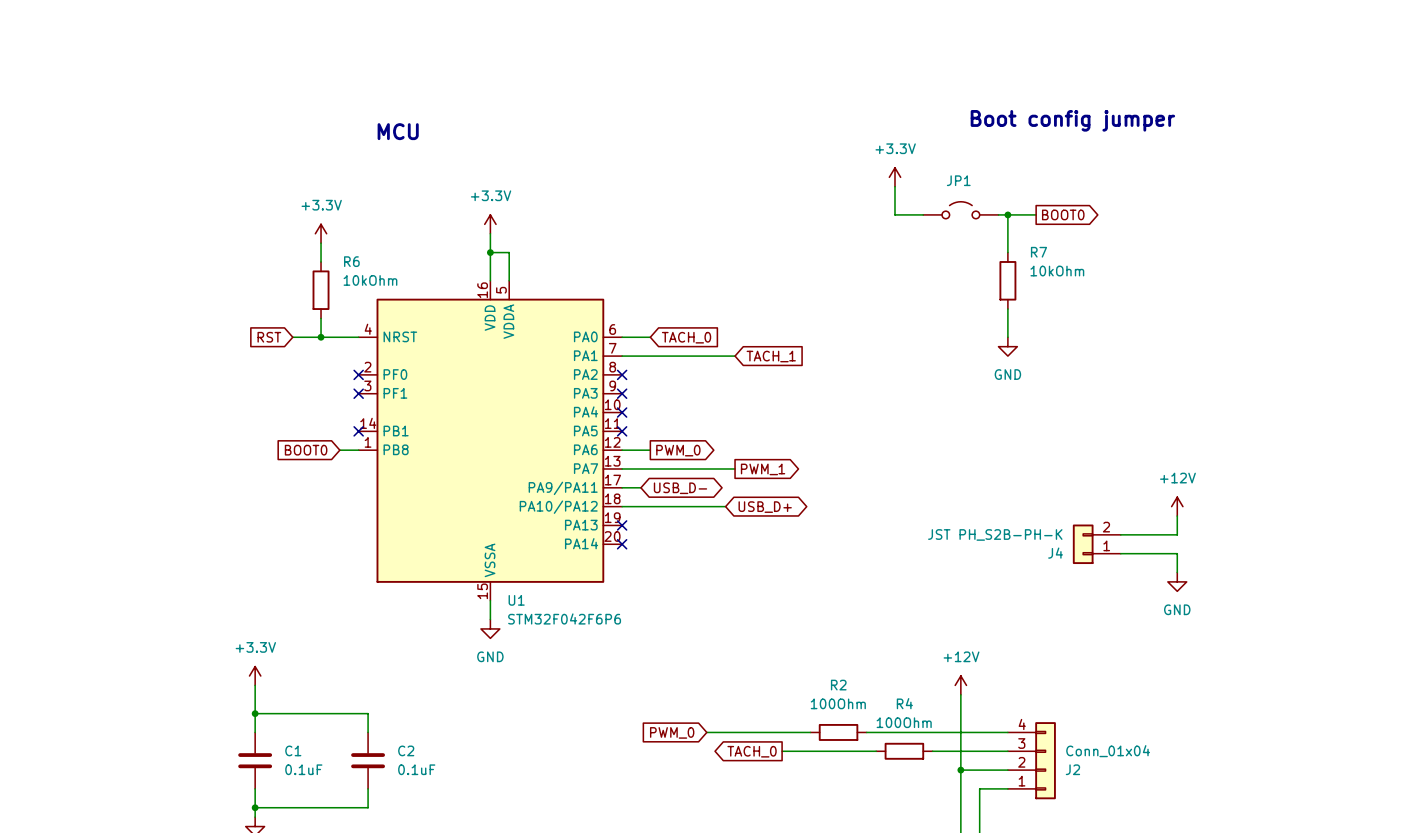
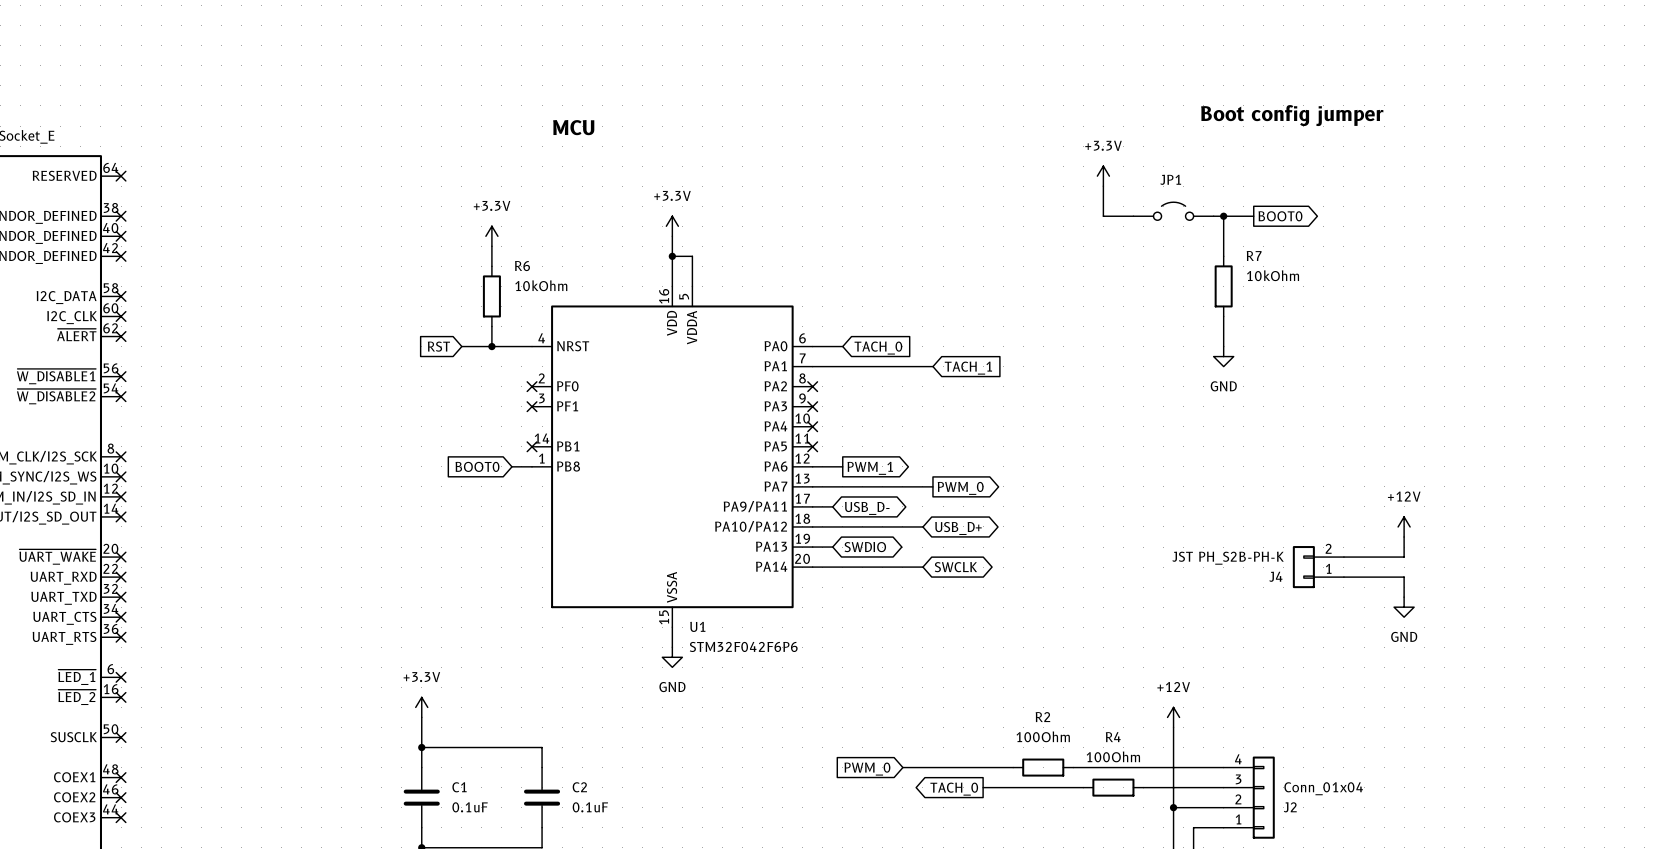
global label: PWM_0 (678, 450) -> PWM_1 (870, 468)
global label: PWM_1 (763, 469) -> PWM_0 (960, 488)
wire: none -> (812, 547) (832, 547)
no-connect mark: (622, 525) -> none
global label: none -> SWDIO (865, 547)
wire: none -> (812, 567) (922, 567)
no-connect mark: (622, 544) -> none
global label: none -> SWCLK (955, 567)

